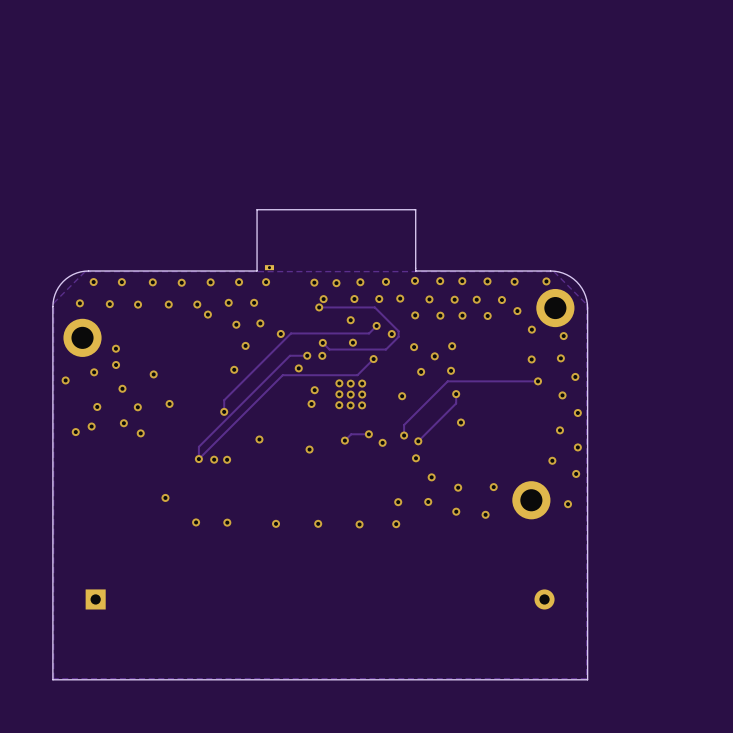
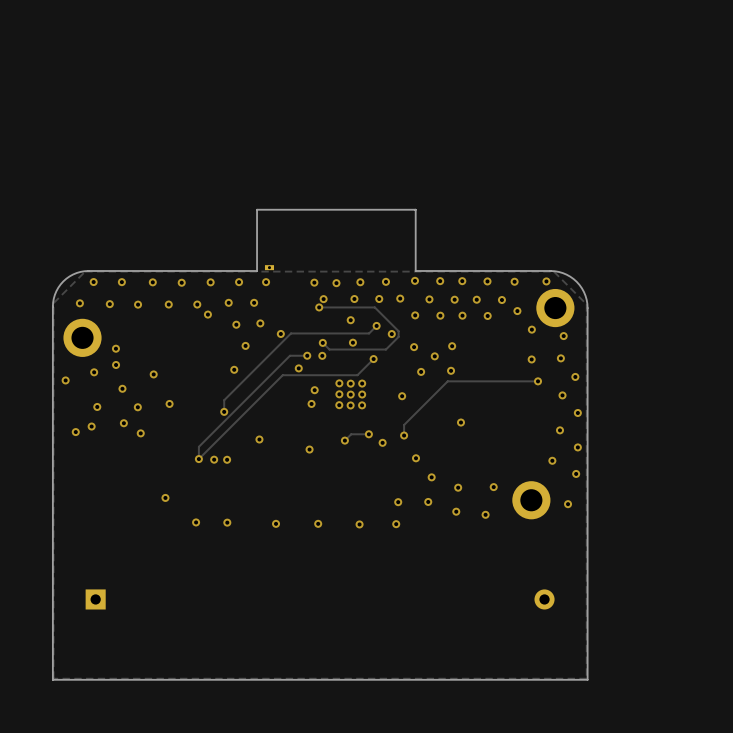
track: (456, 394) (456, 403) (418, 441) -> none
via: (456, 394) -> none
via: (418, 441) -> none

